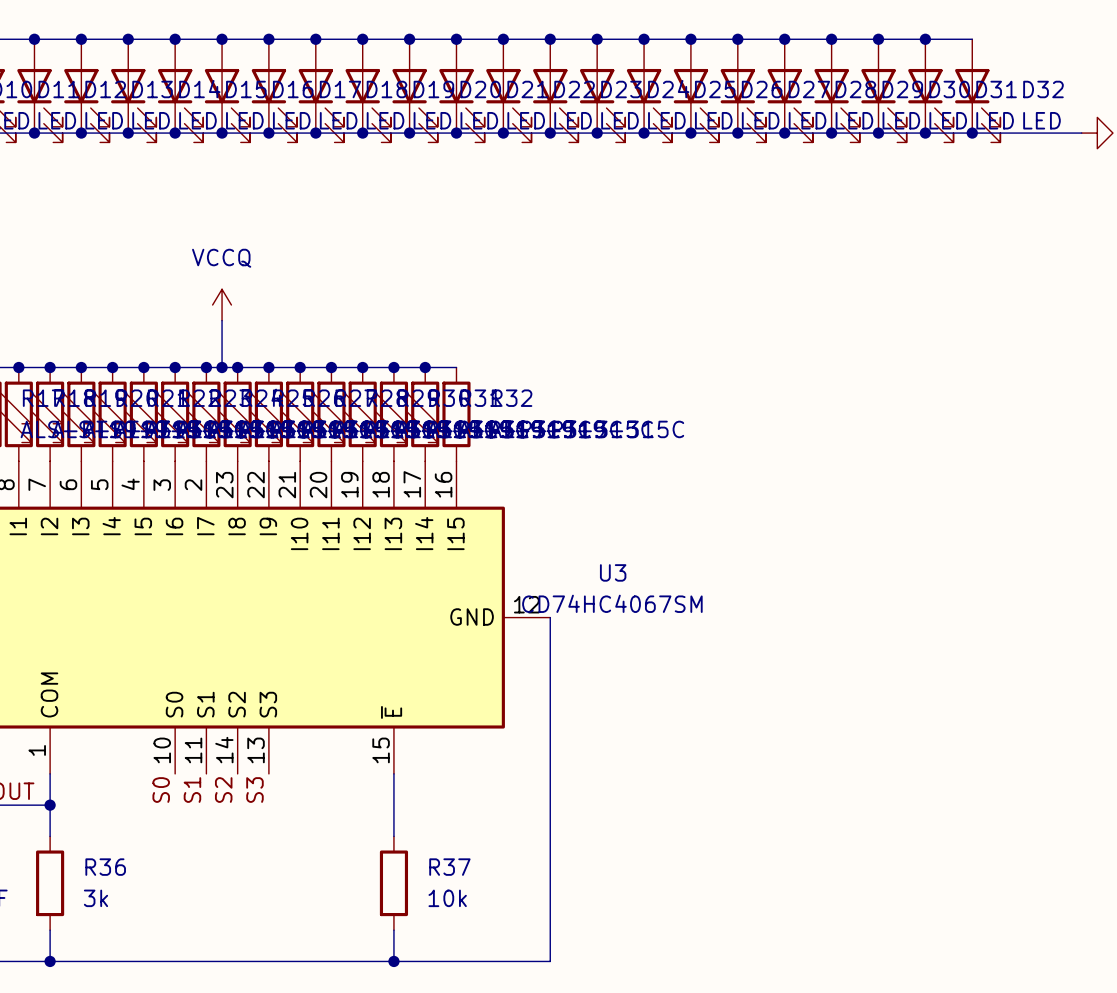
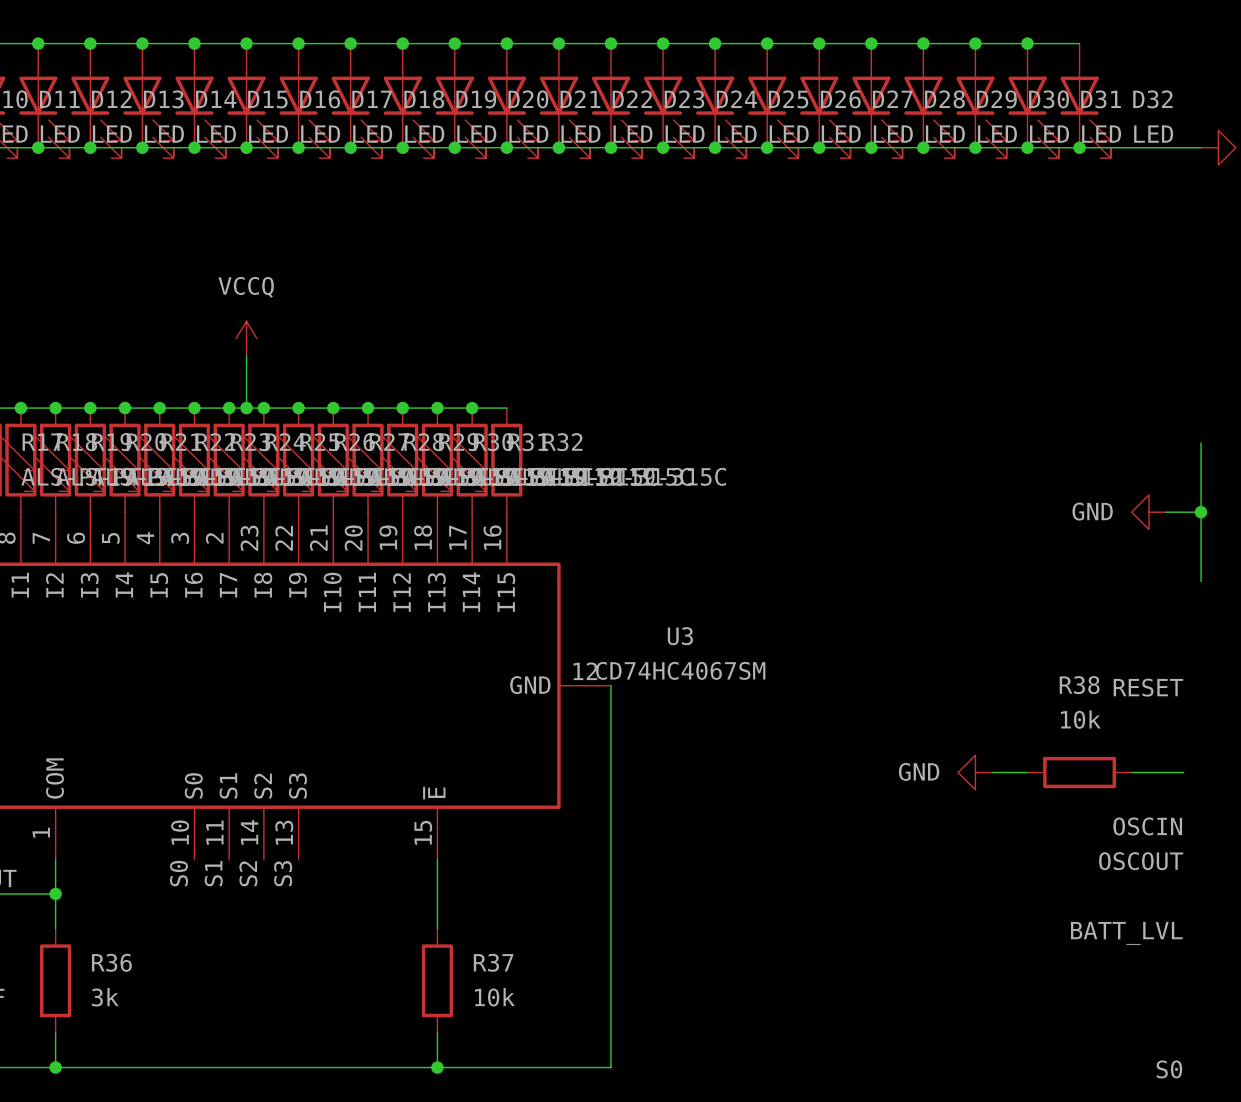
wire: none -> (1201, 442) (1201, 581)
power symbol: none -> GND (1148, 512)
wire: none -> (1166, 512) (1201, 512)
junction: none -> (1201, 512)
label: none -> RESET (1148, 687)
power symbol: none -> GND (975, 772)
wire: none -> (992, 772) (1027, 772)
R38: none -> 10k (1079, 772)
wire: none -> (1131, 772) (1183, 772)
label: none -> OSCIN (1147, 826)
label: none -> OSCOUT (1141, 861)
label: none -> BATT_LVL (1126, 933)
label: none -> S0 (1169, 1069)

